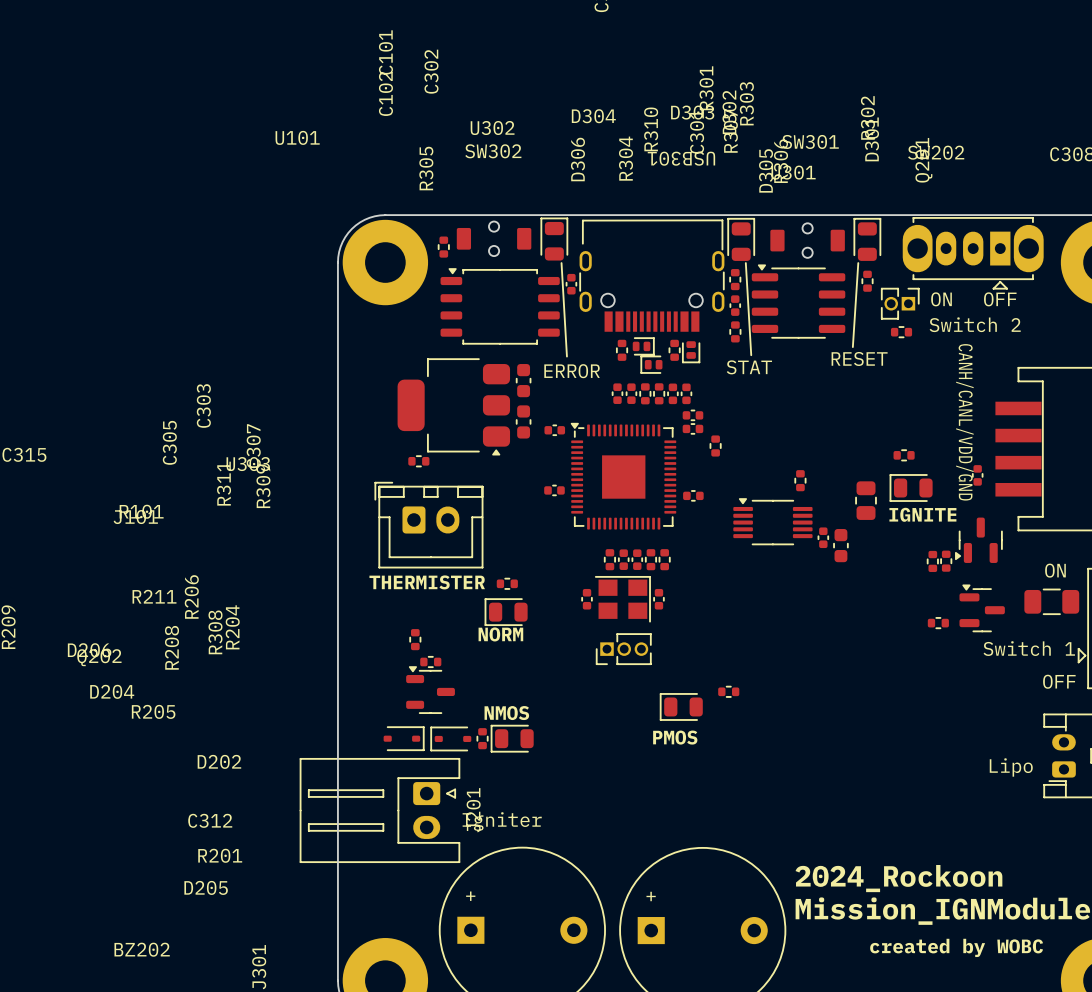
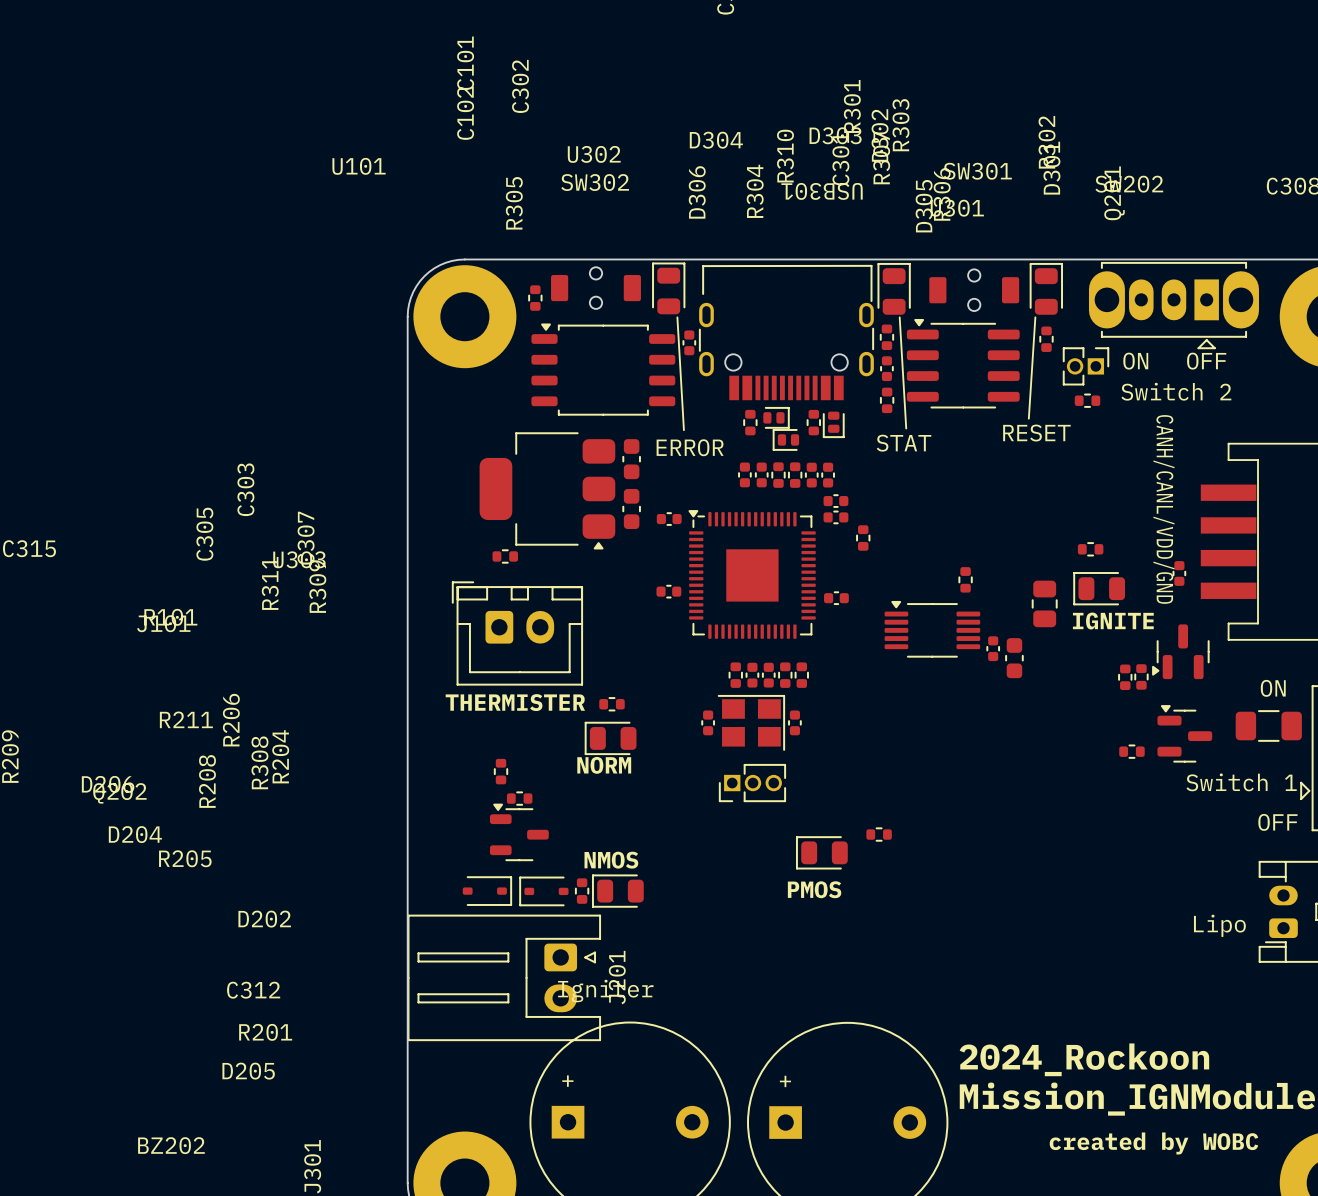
J201 position: (379, 810) -> (504, 977)

